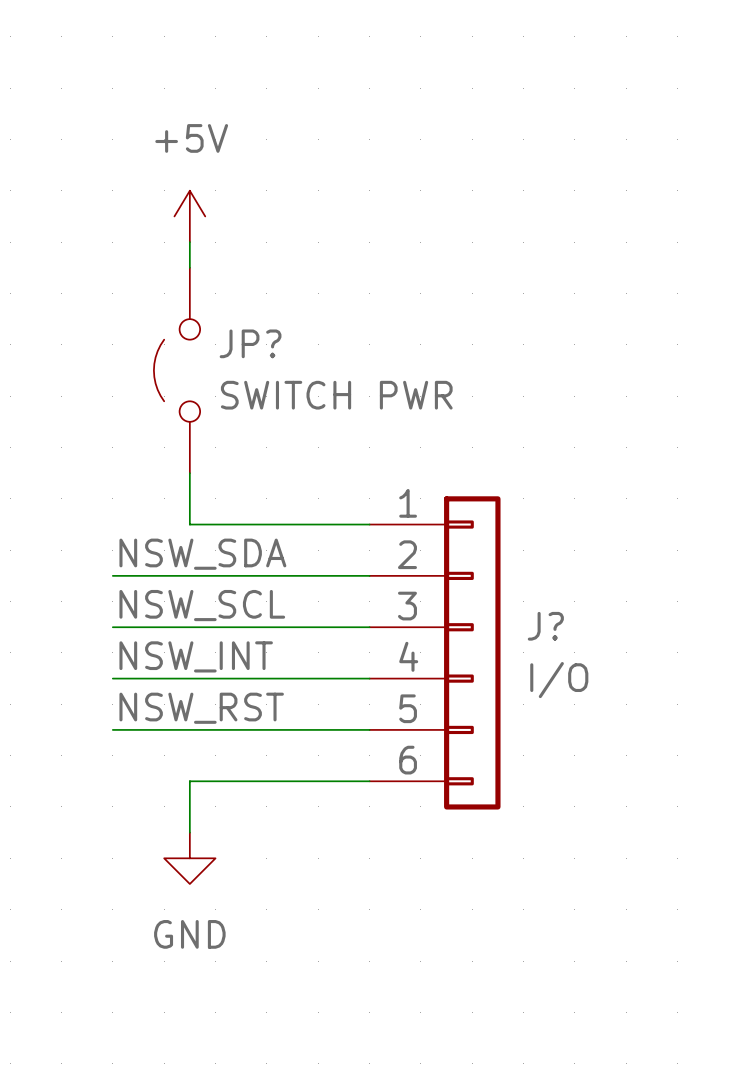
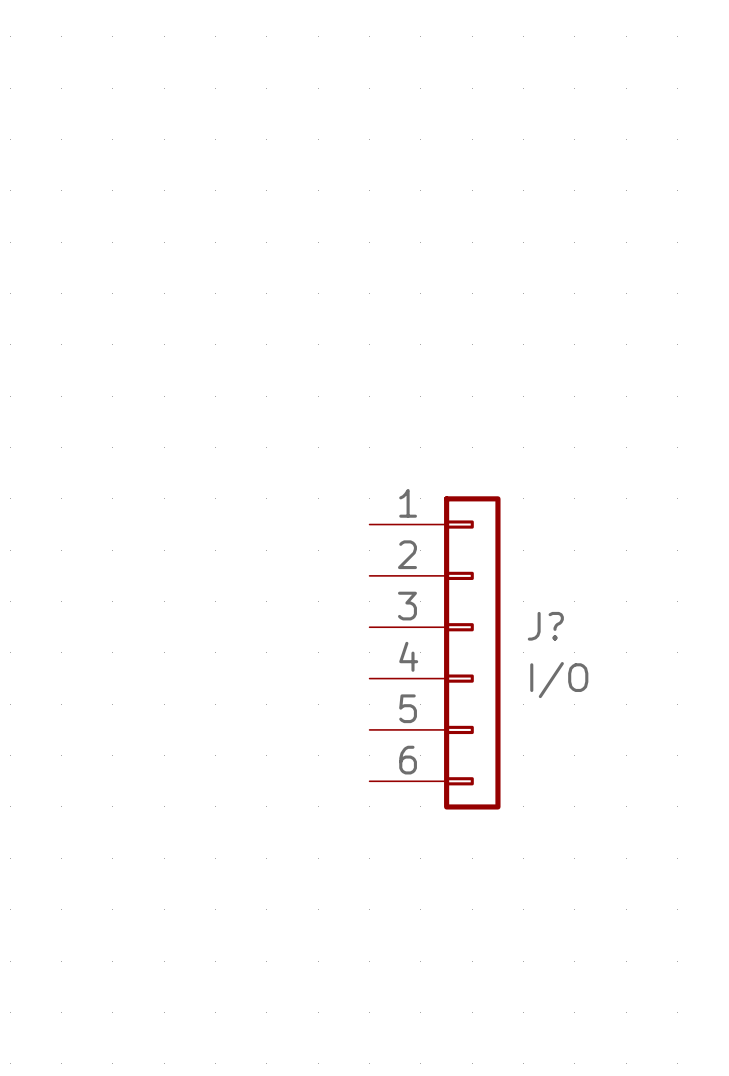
power symbol: +5V (189, 216) -> none
wire: (189, 242) (189, 267) -> none
JP?: SWITCH PWR (177, 370) -> none
wire: (189, 473) (189, 524) (369, 524) -> none
label: NSW_SDA (202, 554) -> none
wire: (112, 575) (369, 575) -> none
label: NSW_SCL (202, 605) -> none
wire: (112, 627) (369, 627) -> none
label: NSW_INT (196, 656) -> none
wire: (112, 678) (369, 678) -> none
label: NSW_RST (201, 708) -> none
wire: (112, 729) (369, 729) -> none
wire: (369, 781) (189, 781) (189, 832) -> none
power symbol: GND (189, 858) -> none

